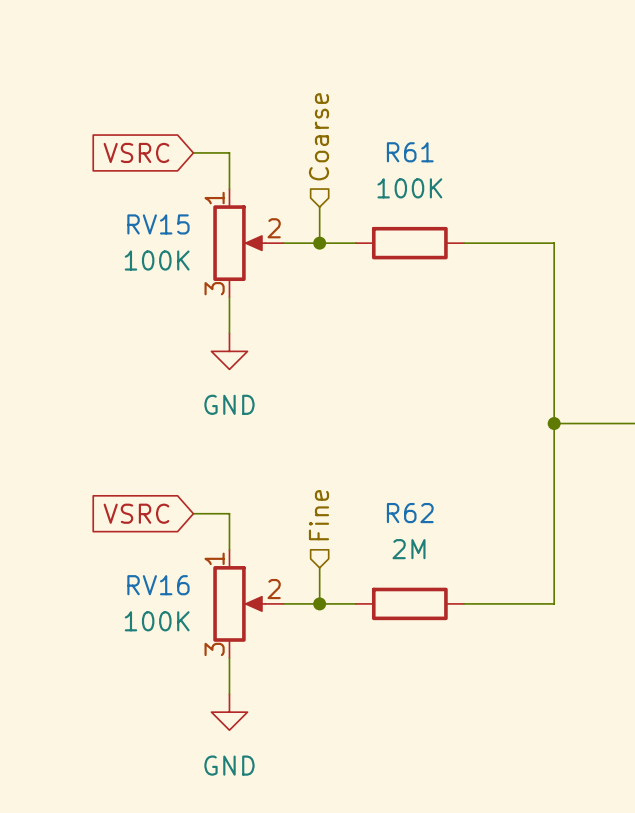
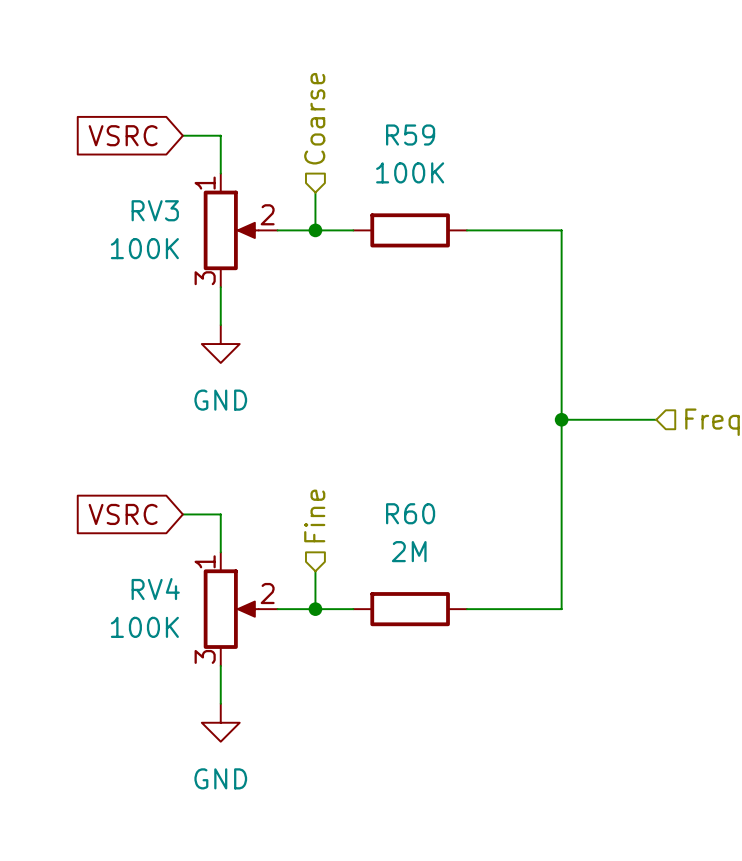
R61 name: R61 (410, 152) -> R59 (410, 135)
RV15 name: RV15 (158, 224) -> RV3 (155, 210)
R62 name: R62 (410, 513) -> R60 (410, 513)
RV16 name: RV16 (158, 585) -> RV4 (155, 589)

